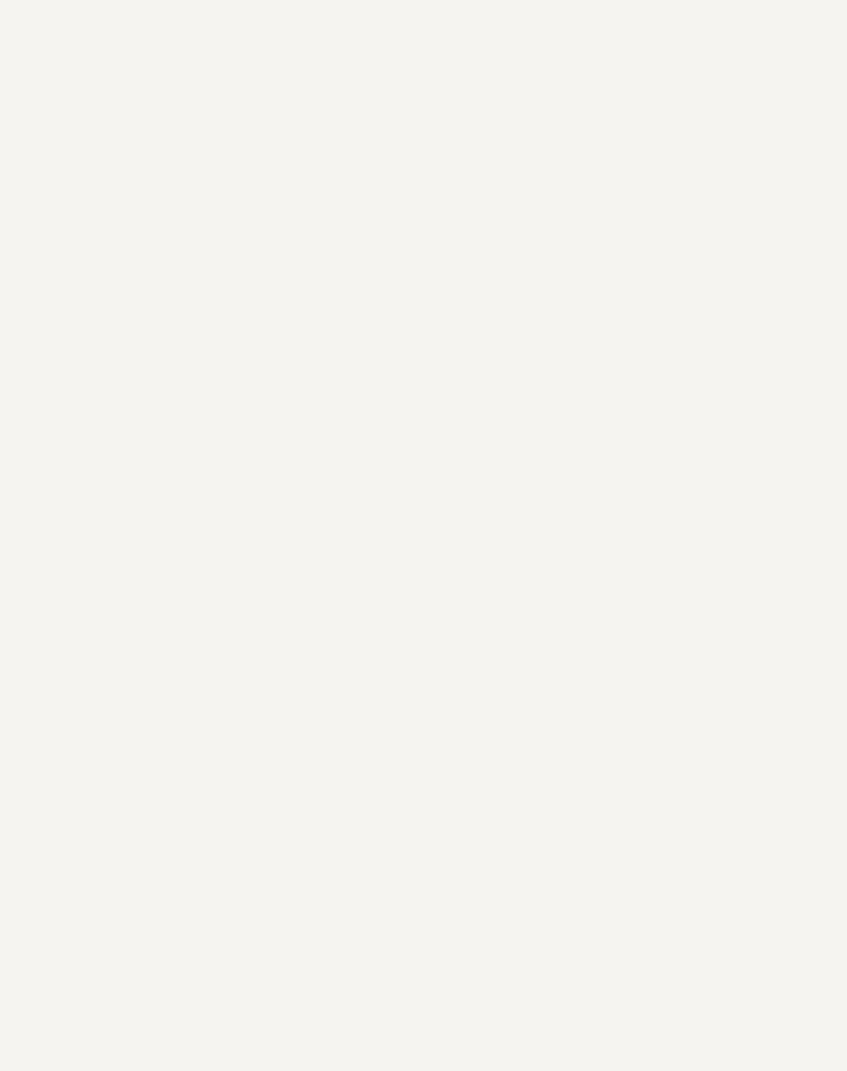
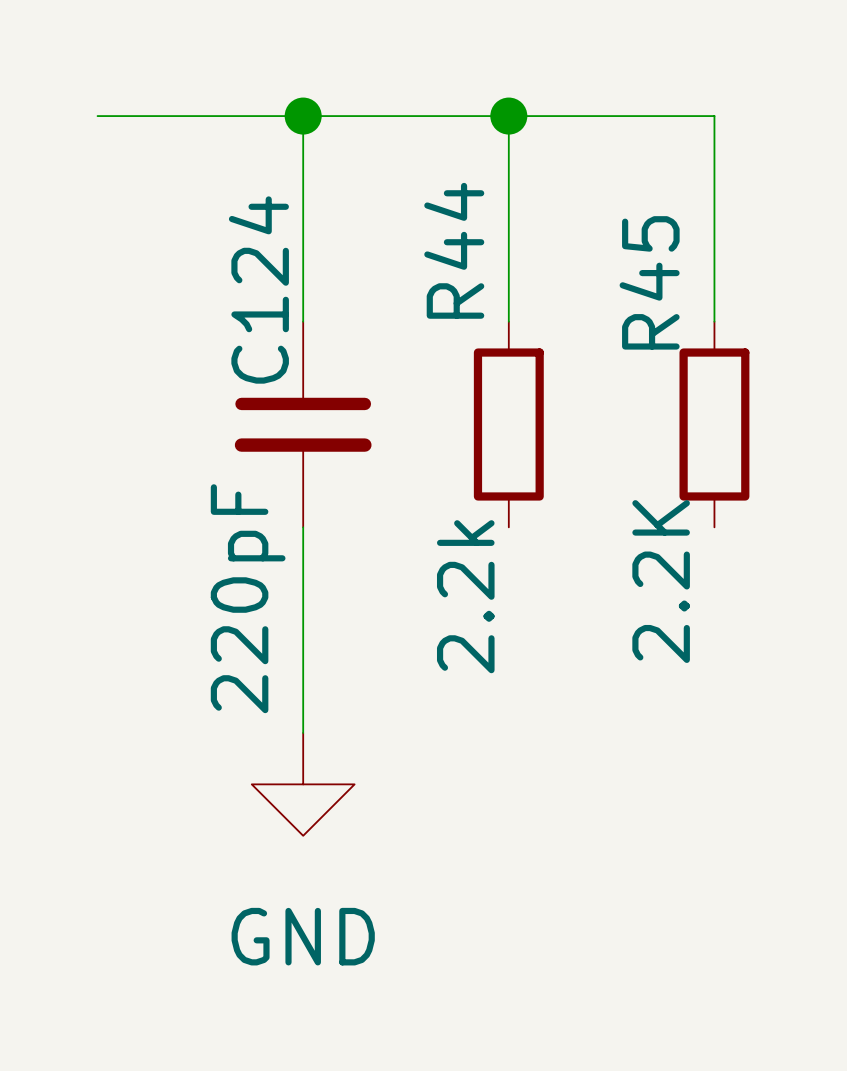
wire: none -> (97, 116) (714, 116) (714, 321)
wire: none -> (303, 116) (303, 321)
junction: none -> (303, 116)
wire: none -> (508, 116) (508, 321)
junction: none -> (508, 116)
C124: none -> 220pF (303, 424)
R44: none -> 2.2k (508, 424)
R45: none -> 2.2K (714, 424)
wire: none -> (303, 527) (303, 732)
power symbol: none -> GND (303, 784)

